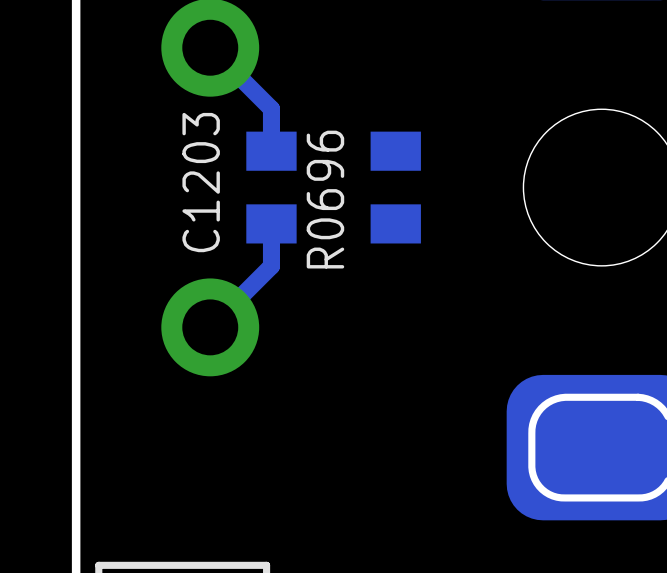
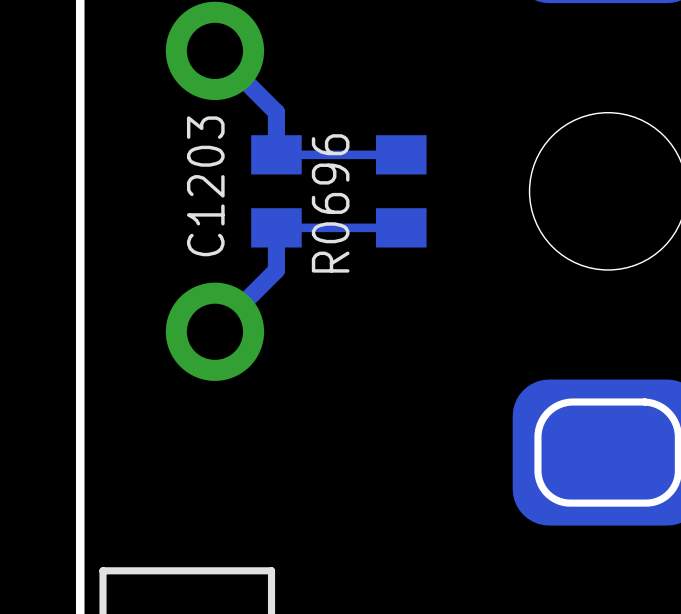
track: none -> (401, 154) (276, 154)
track: none -> (401, 227) (276, 227)

